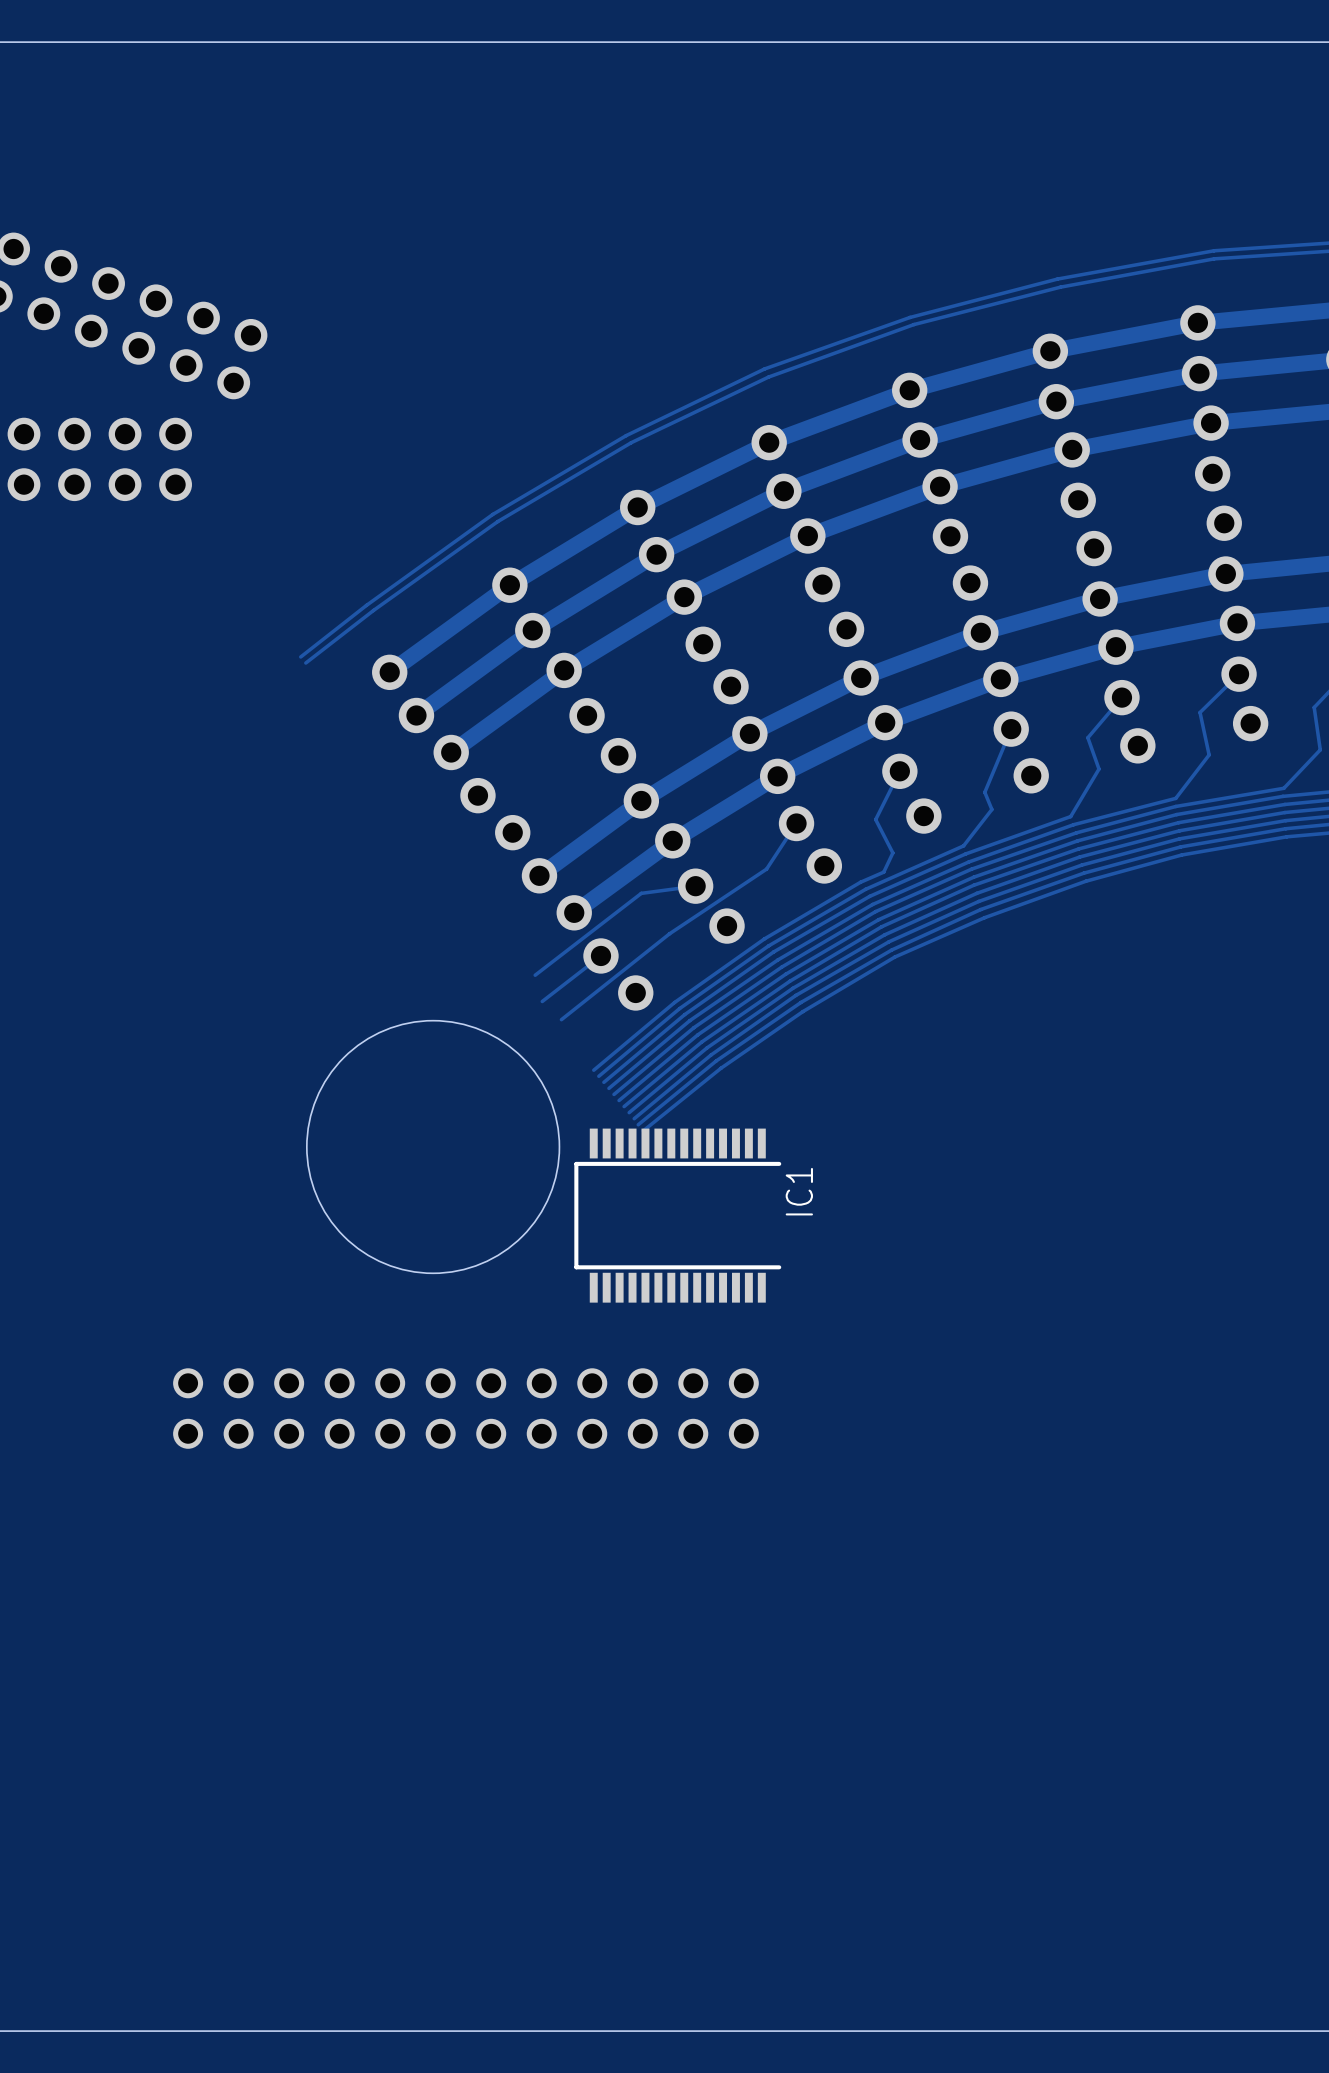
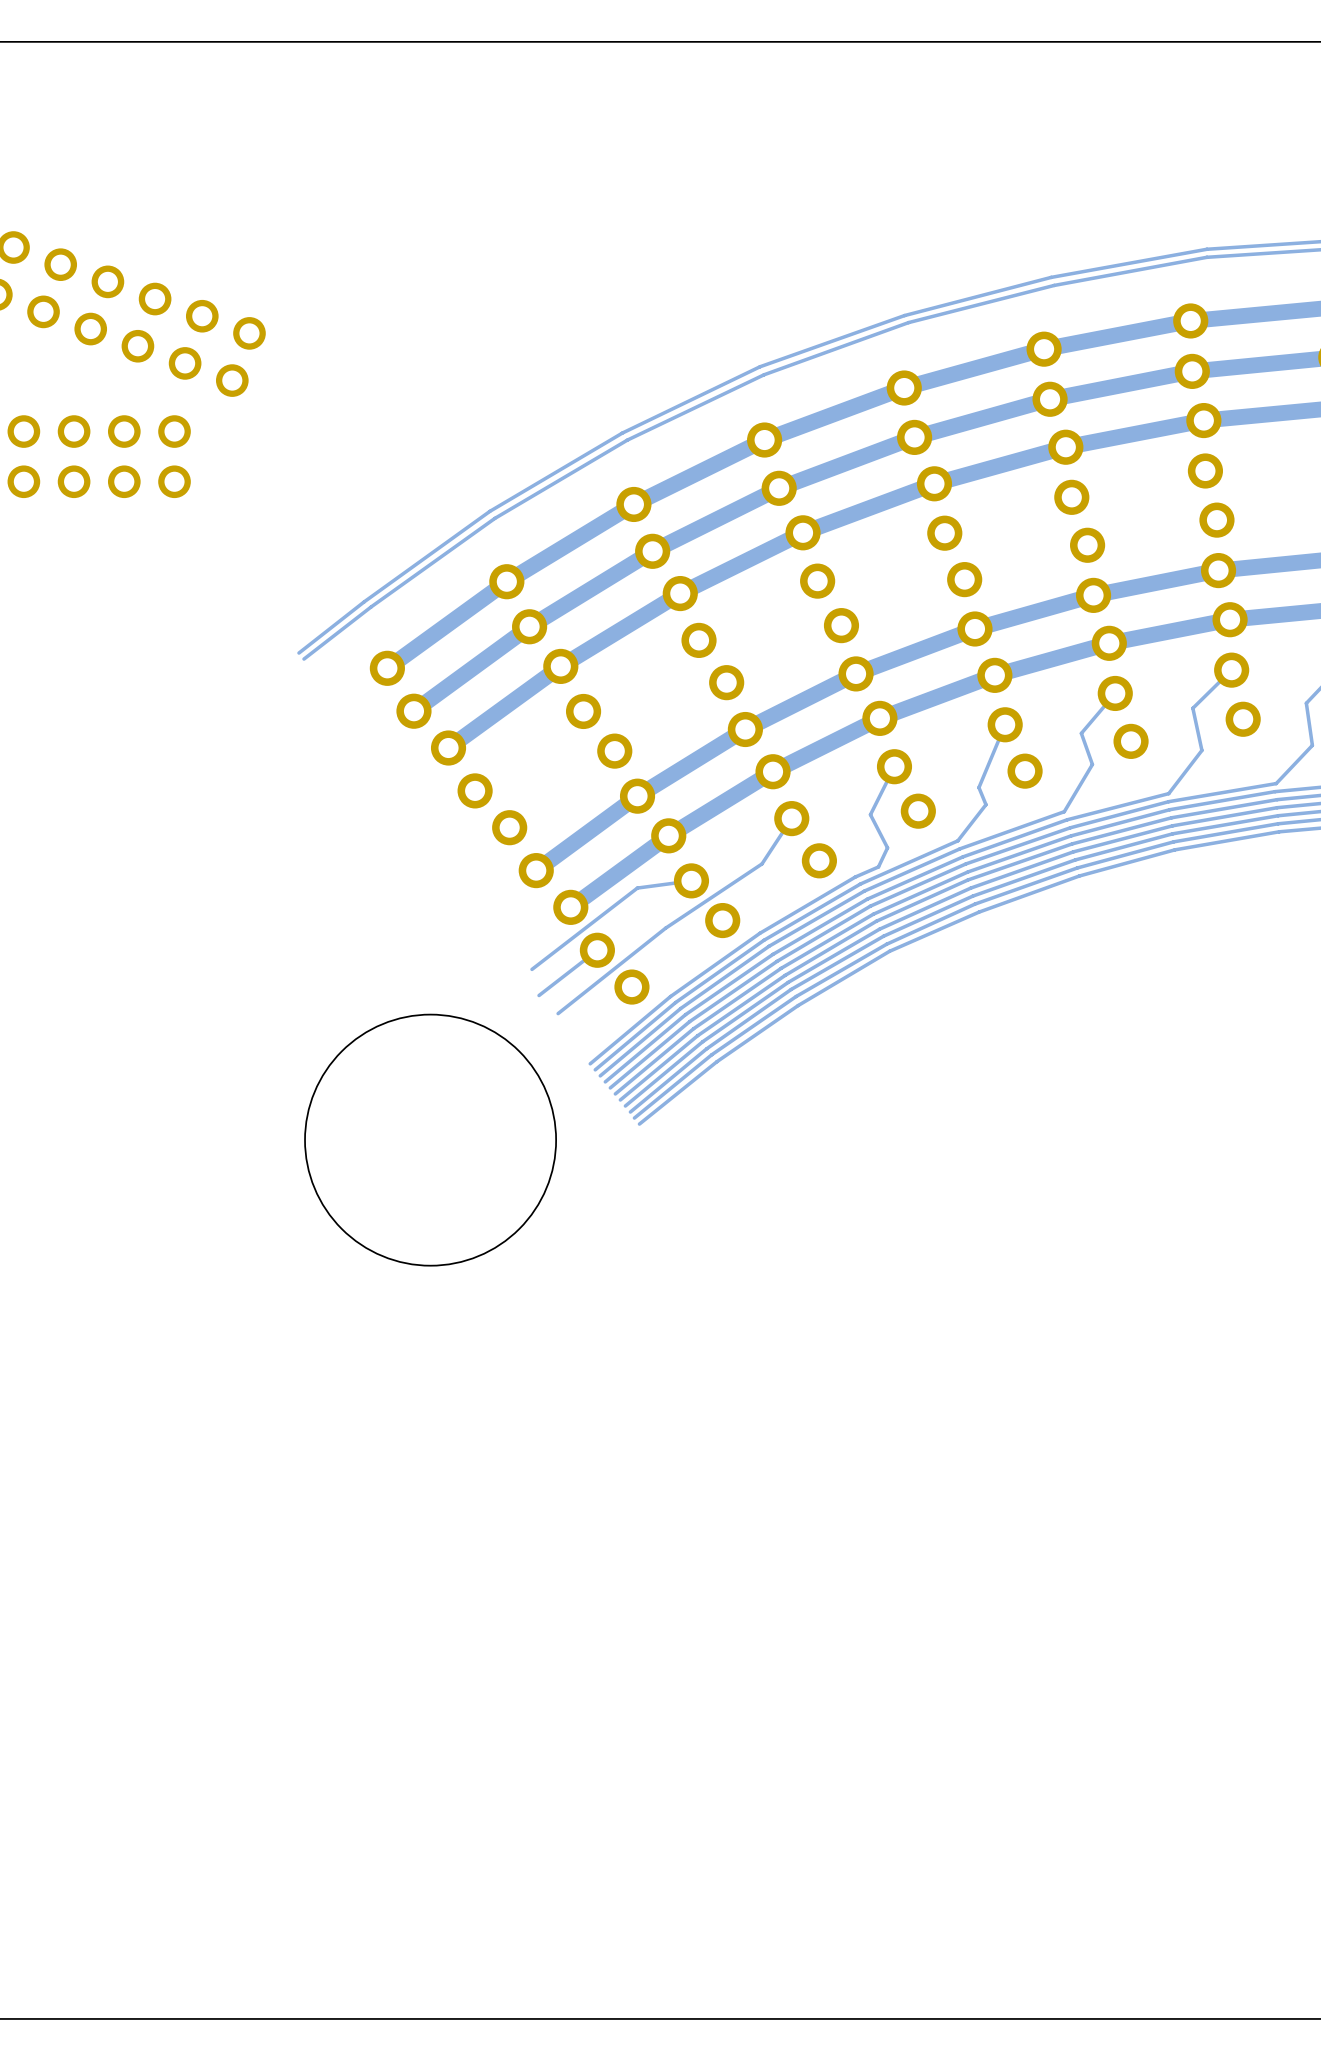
IC1: (677, 1215) -> none
part: (465, 1408) -> none

